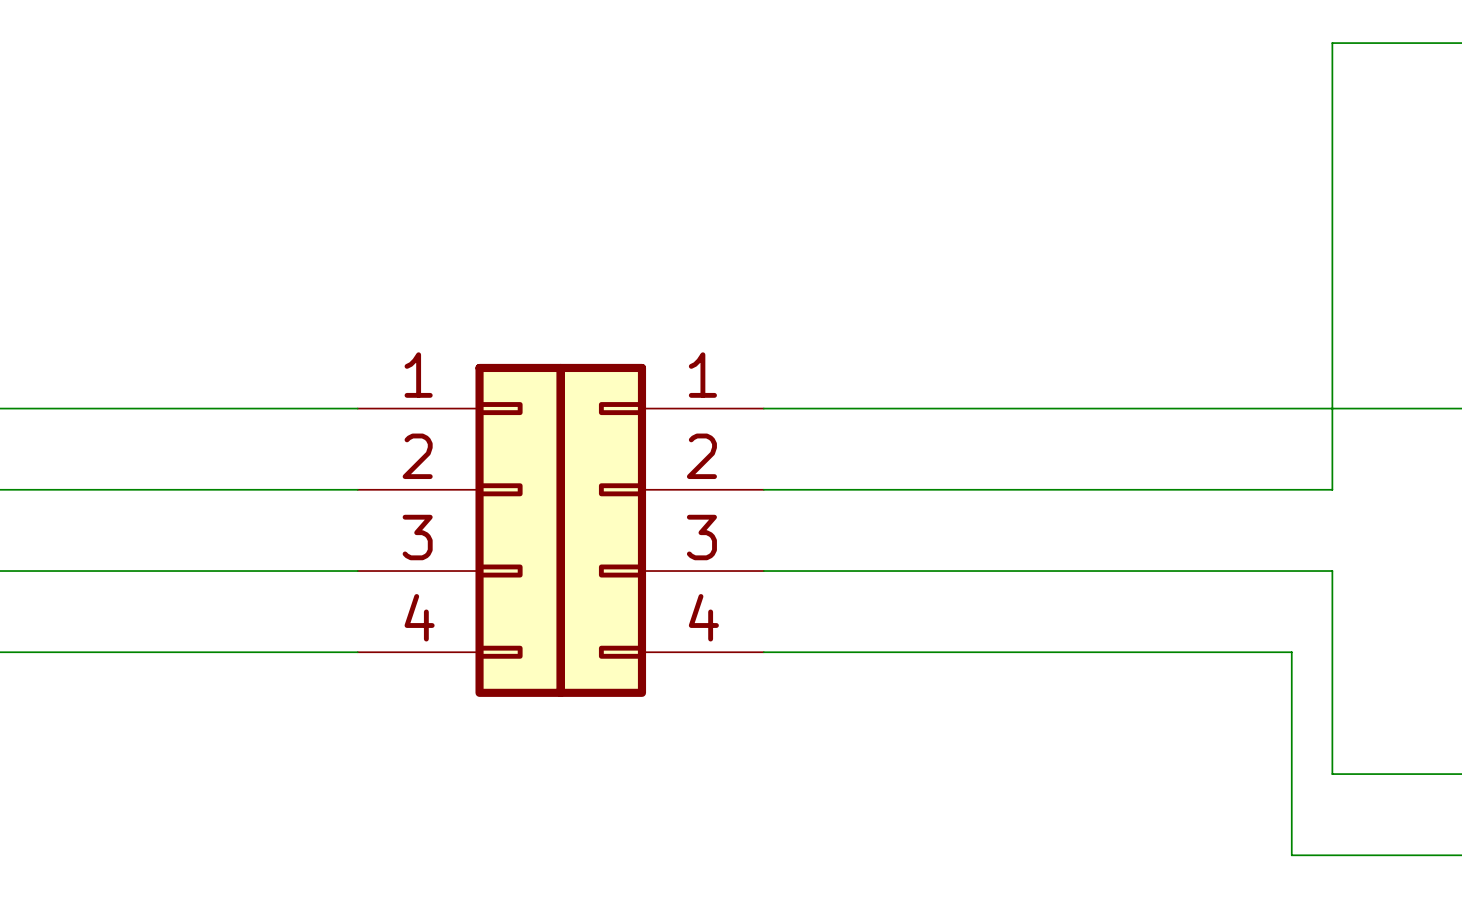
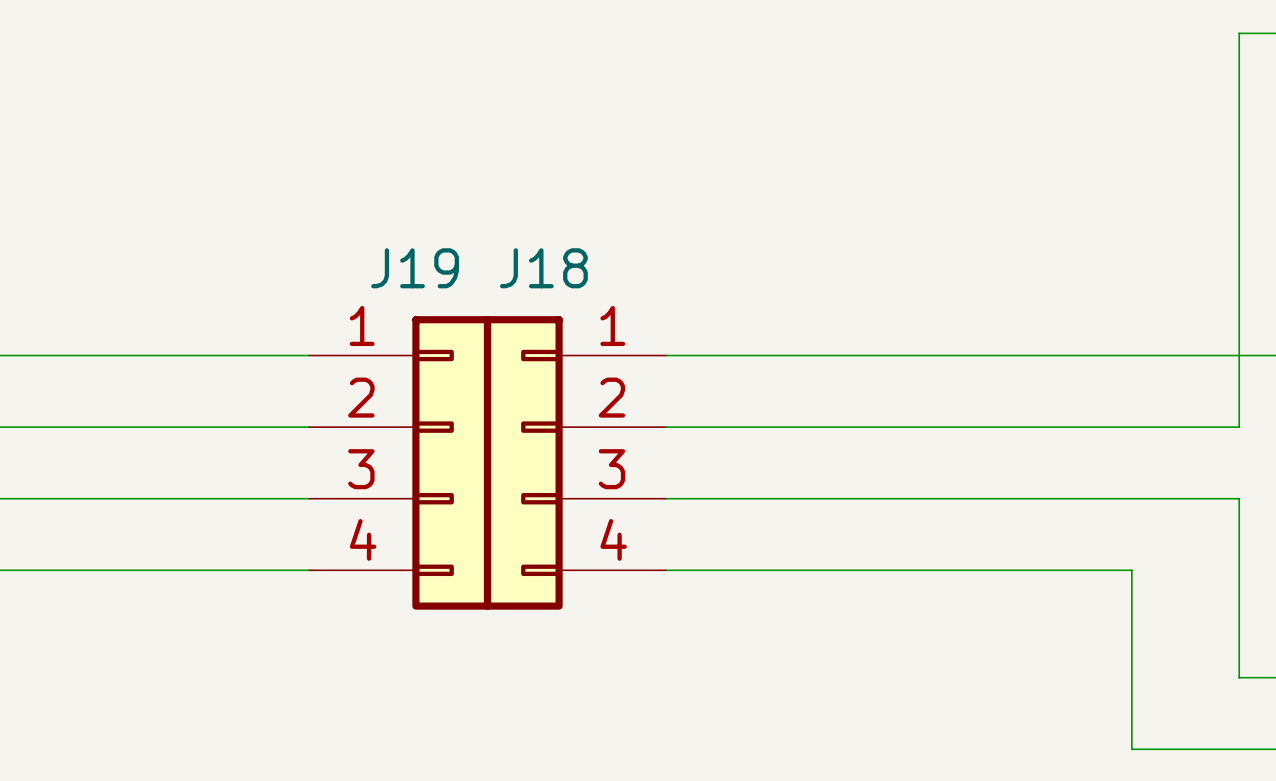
wire: (1413, 43) (1332, 43) (1332, 489) -> (1239, 33) (1239, 427) (1167, 427)
J19 name: none -> J19 (415, 268)
J18 name: none -> J18 (543, 268)
wire: (1332, 571) (1332, 774) (1413, 774) -> (1167, 498) (1239, 498) (1239, 677)

